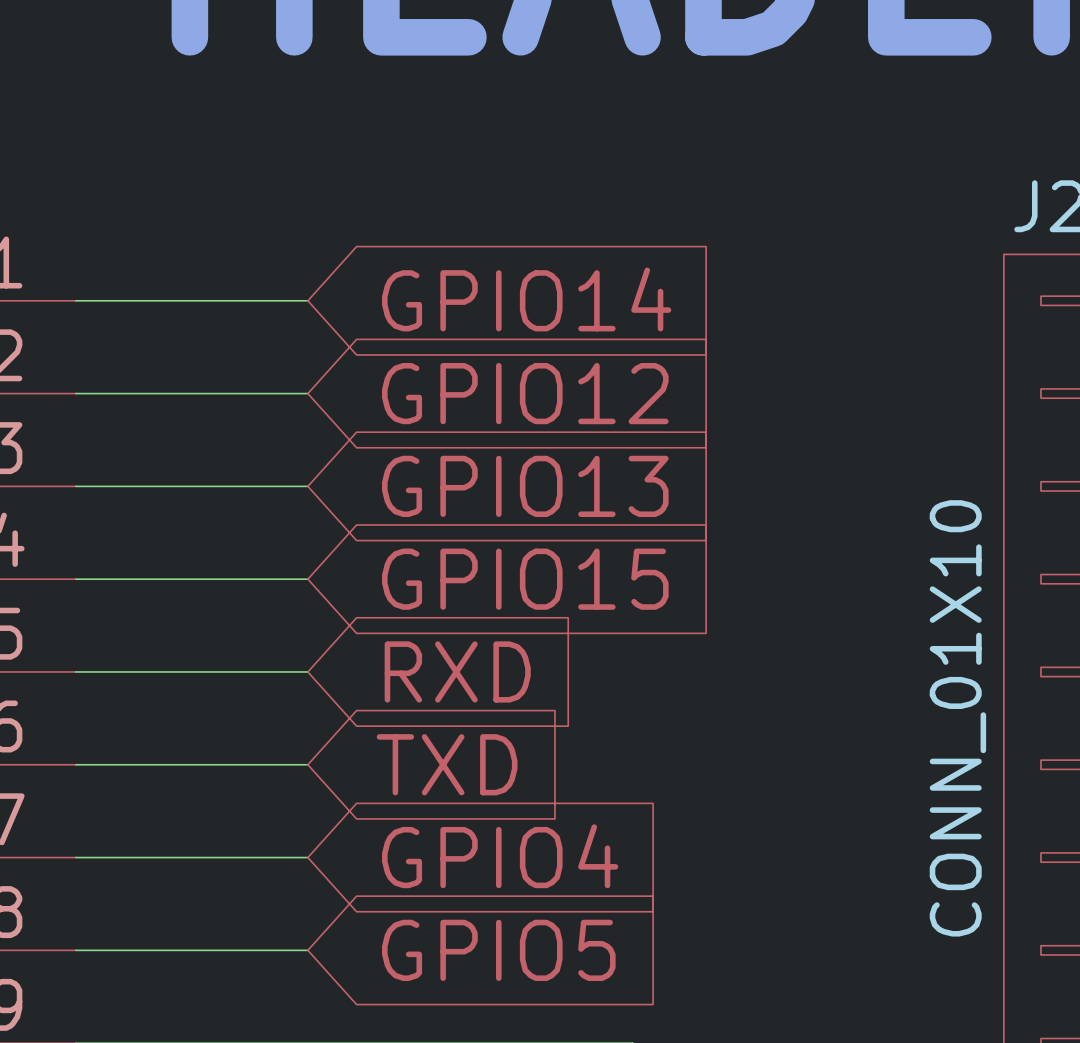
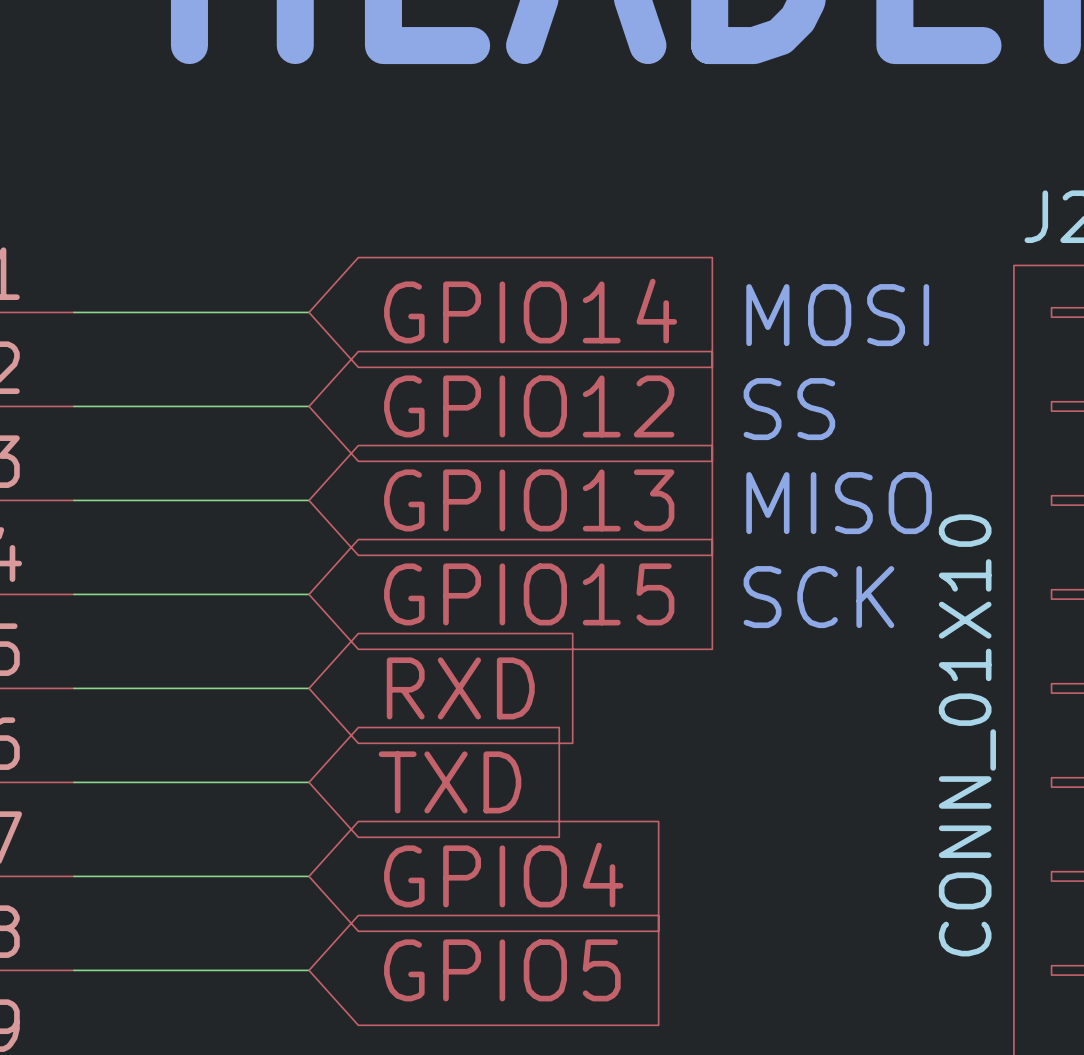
text: none -> MOSI (837, 315)
text: none -> SS (789, 409)
text: none -> MISO (839, 503)
text: none -> SCK (818, 597)

